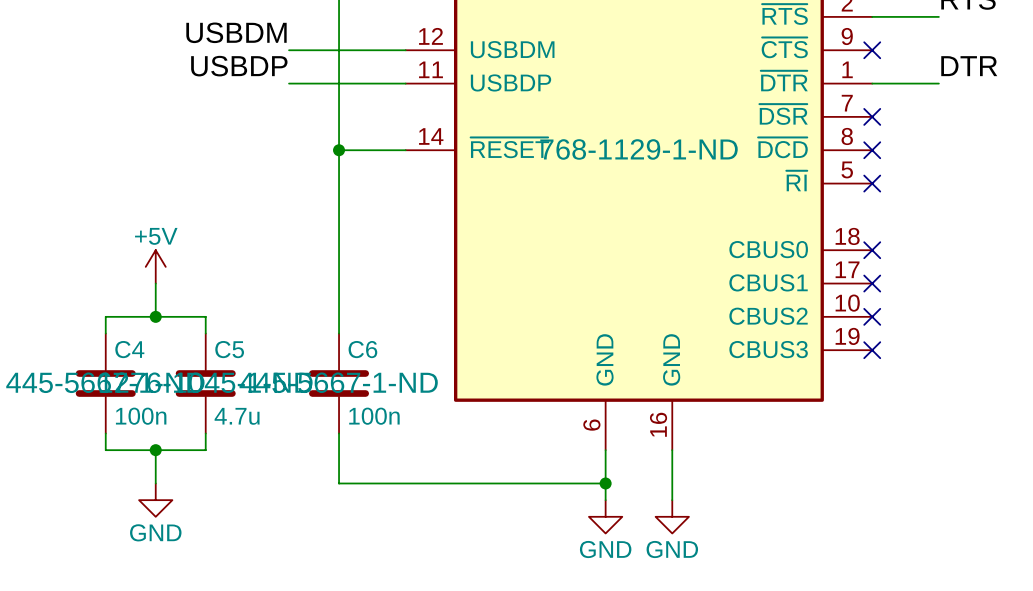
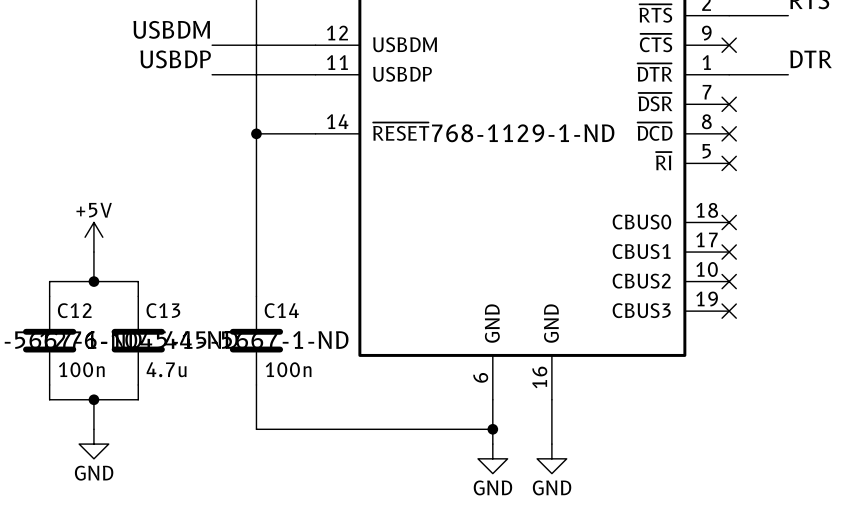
C4 name: C4 (129, 349) -> C12 (74, 310)
C5 name: C5 (229, 349) -> C13 (163, 310)
C6 name: C6 (362, 349) -> C14 (281, 310)

